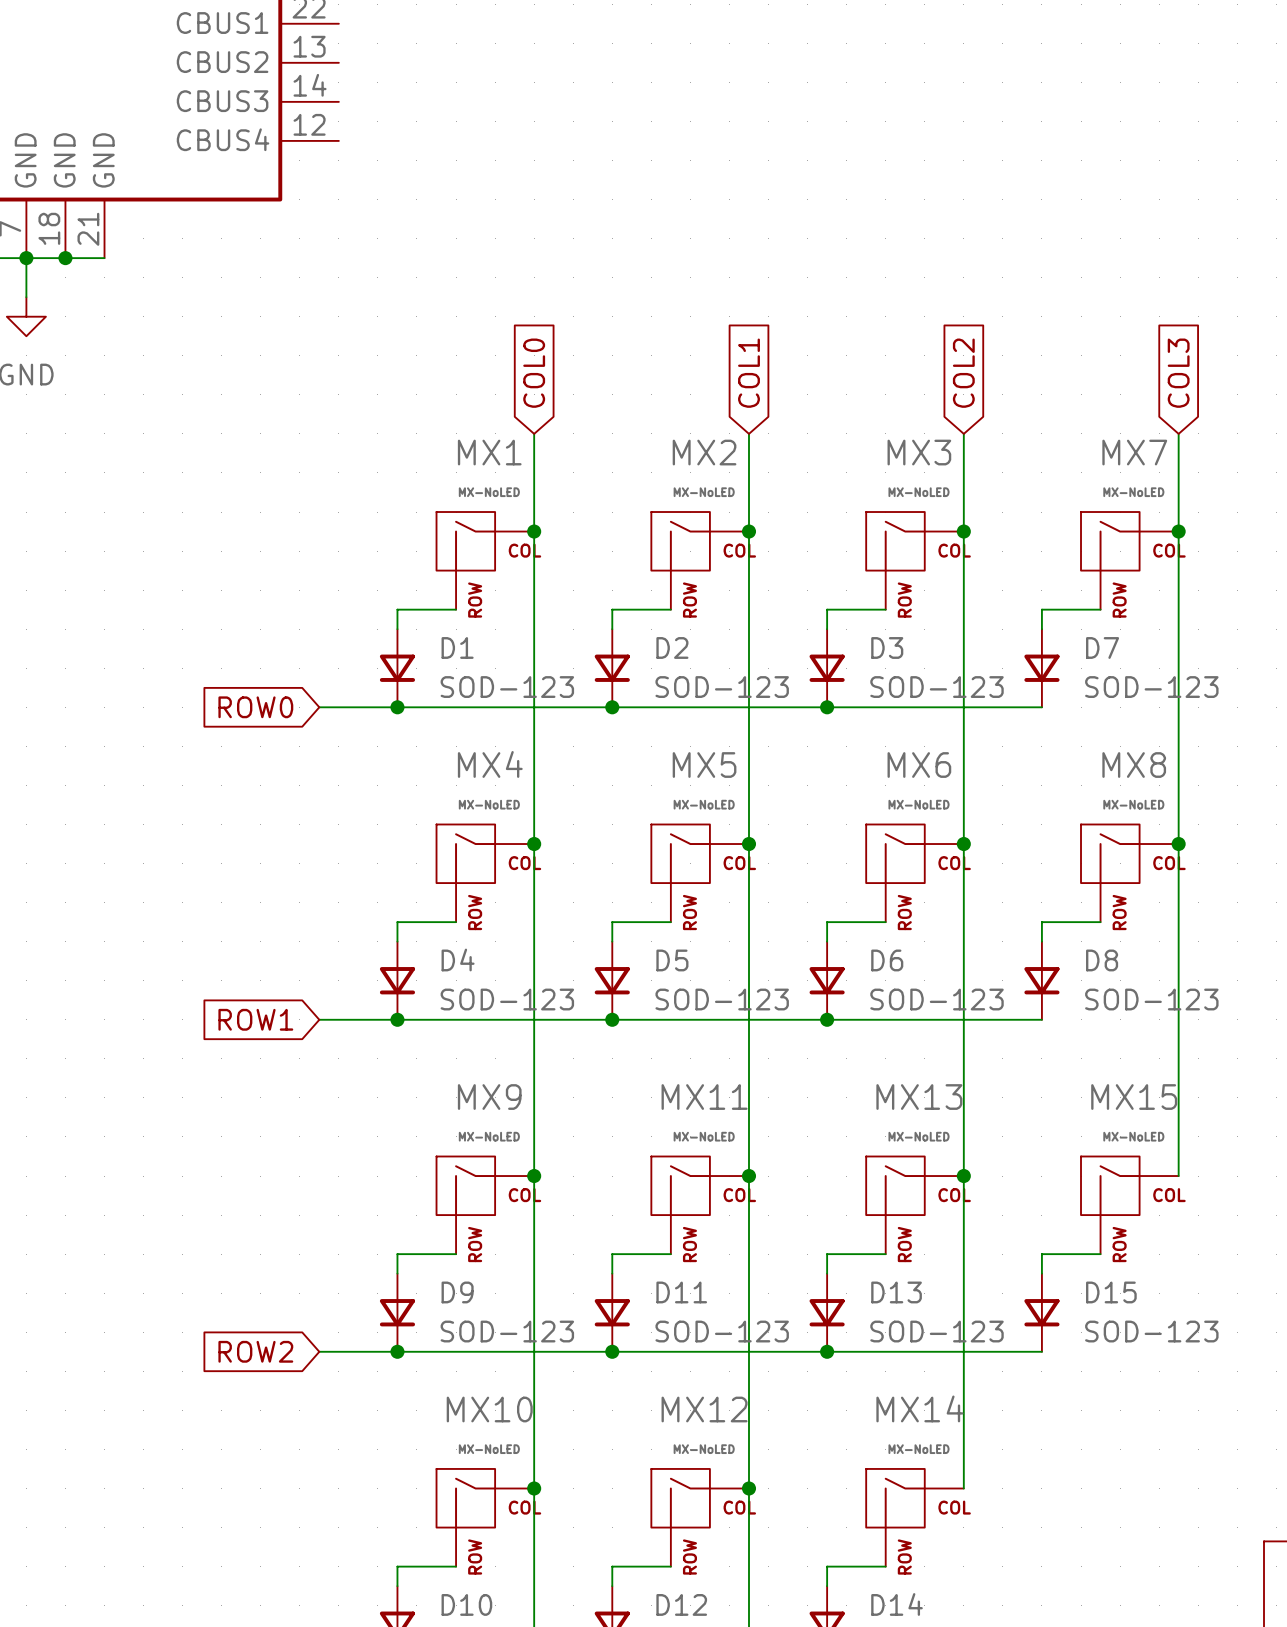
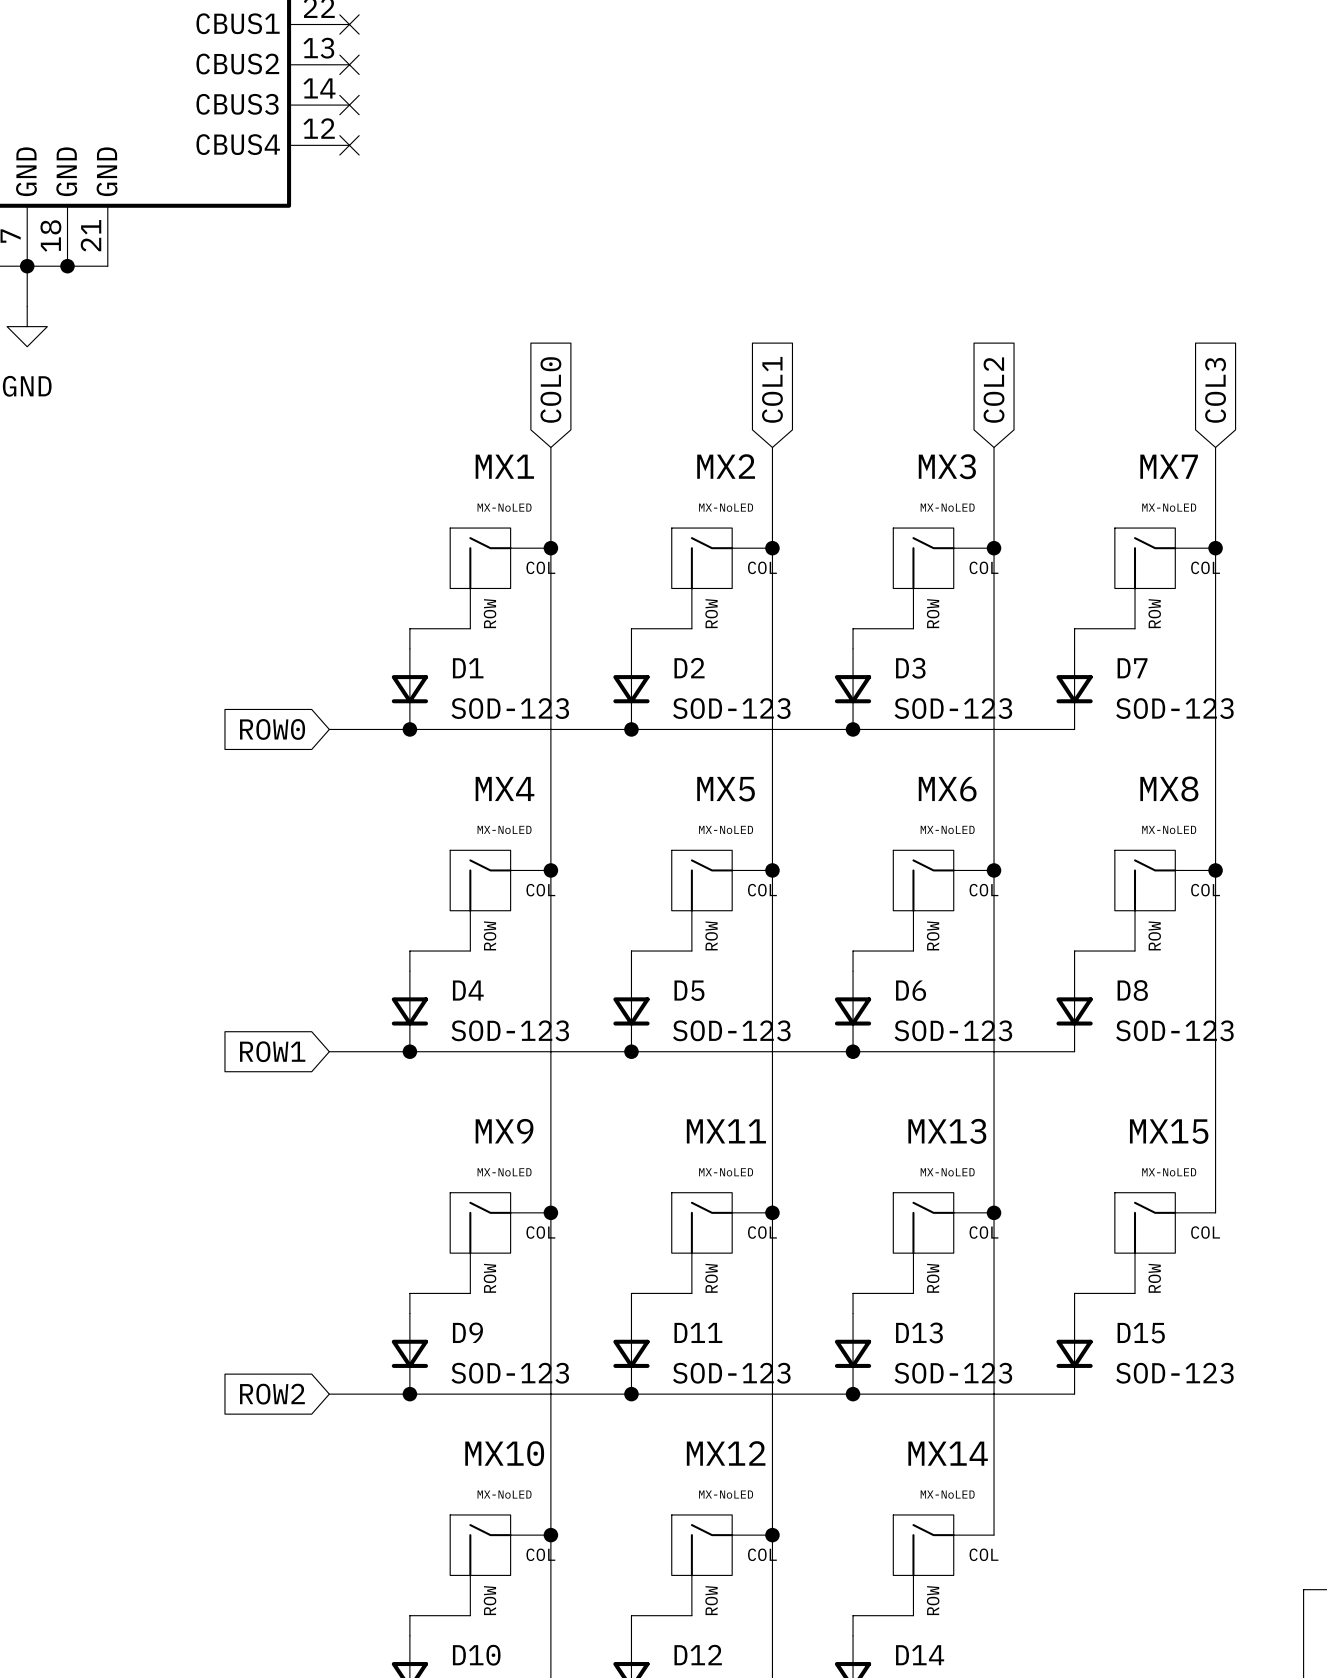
no-connect mark: none -> (349, 24)
no-connect mark: none -> (349, 64)
no-connect mark: none -> (349, 105)
no-connect mark: none -> (349, 145)

